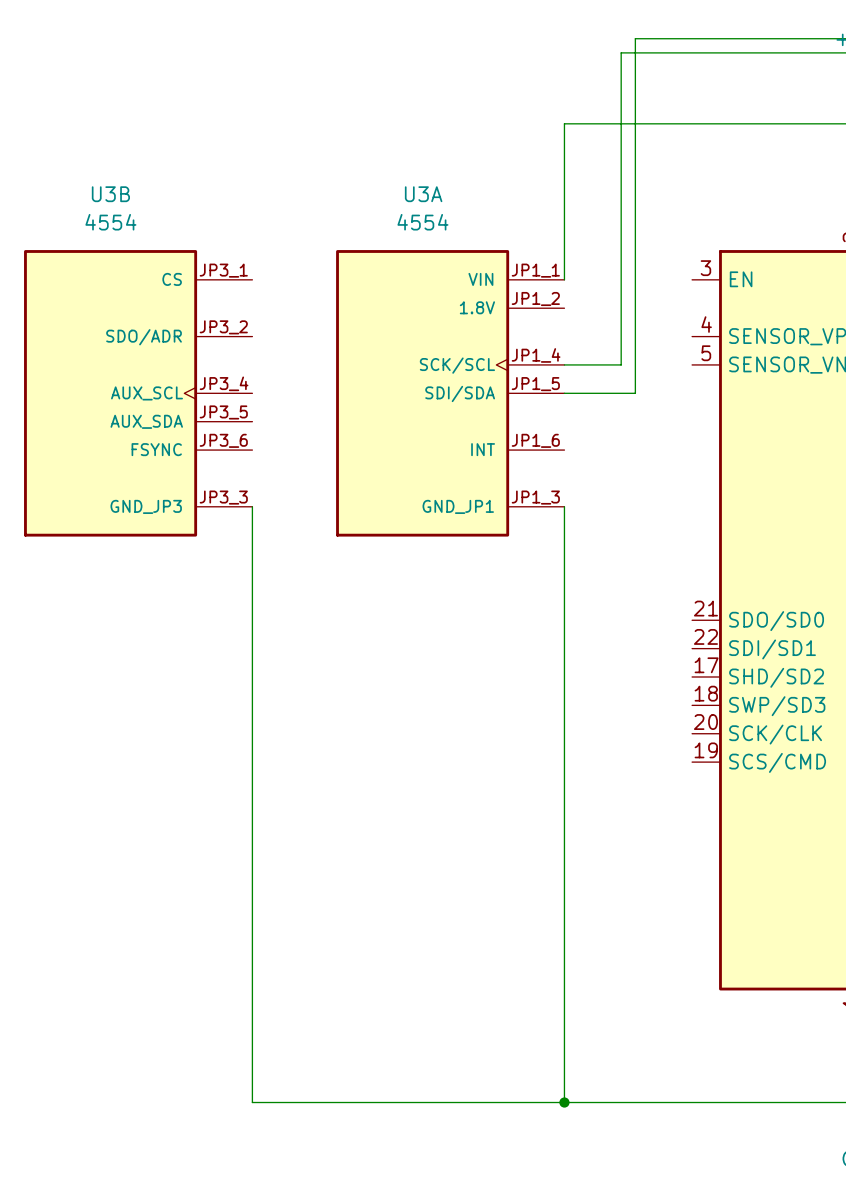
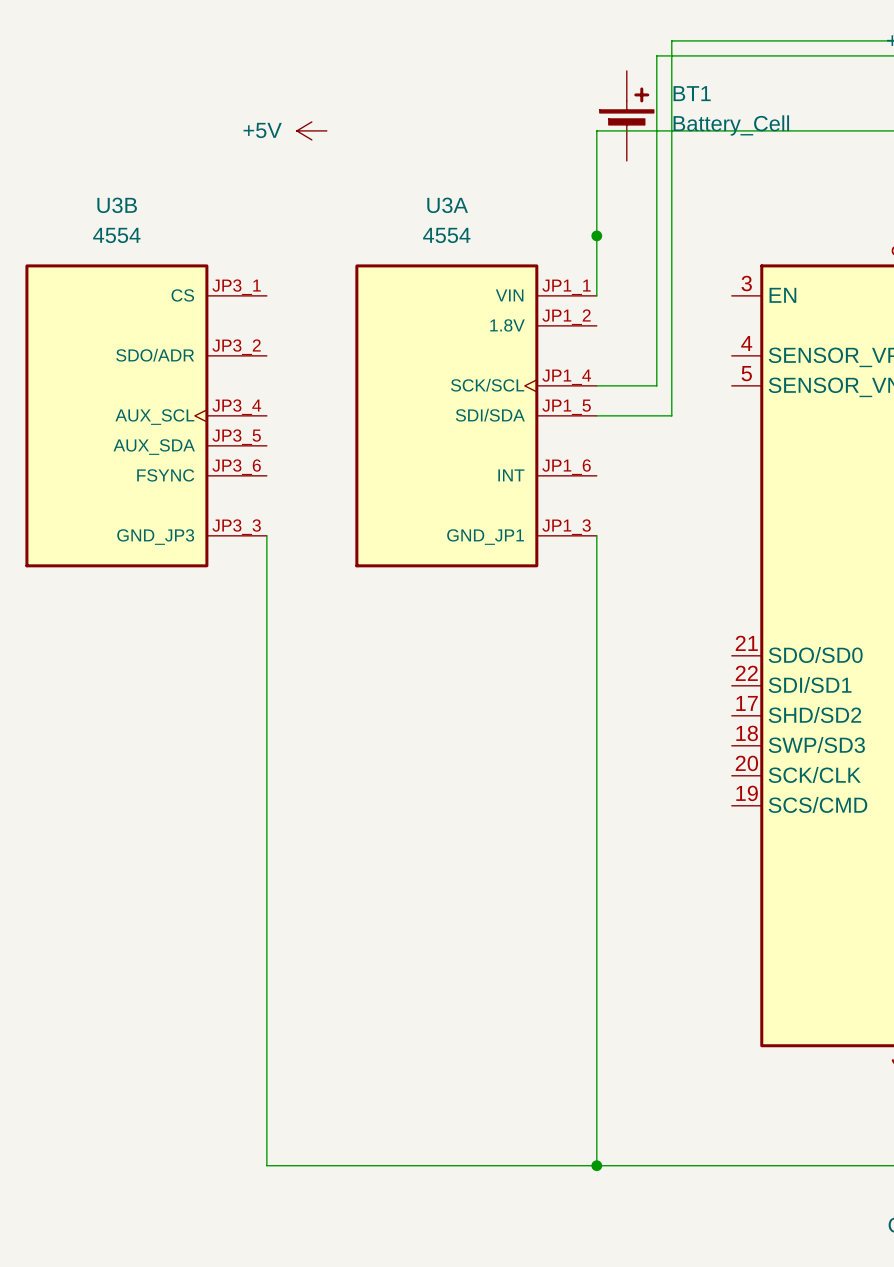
BT1: none -> Battery_Cell (626, 115)
power symbol: none -> +5V (311, 130)
junction: none -> (596, 235)

